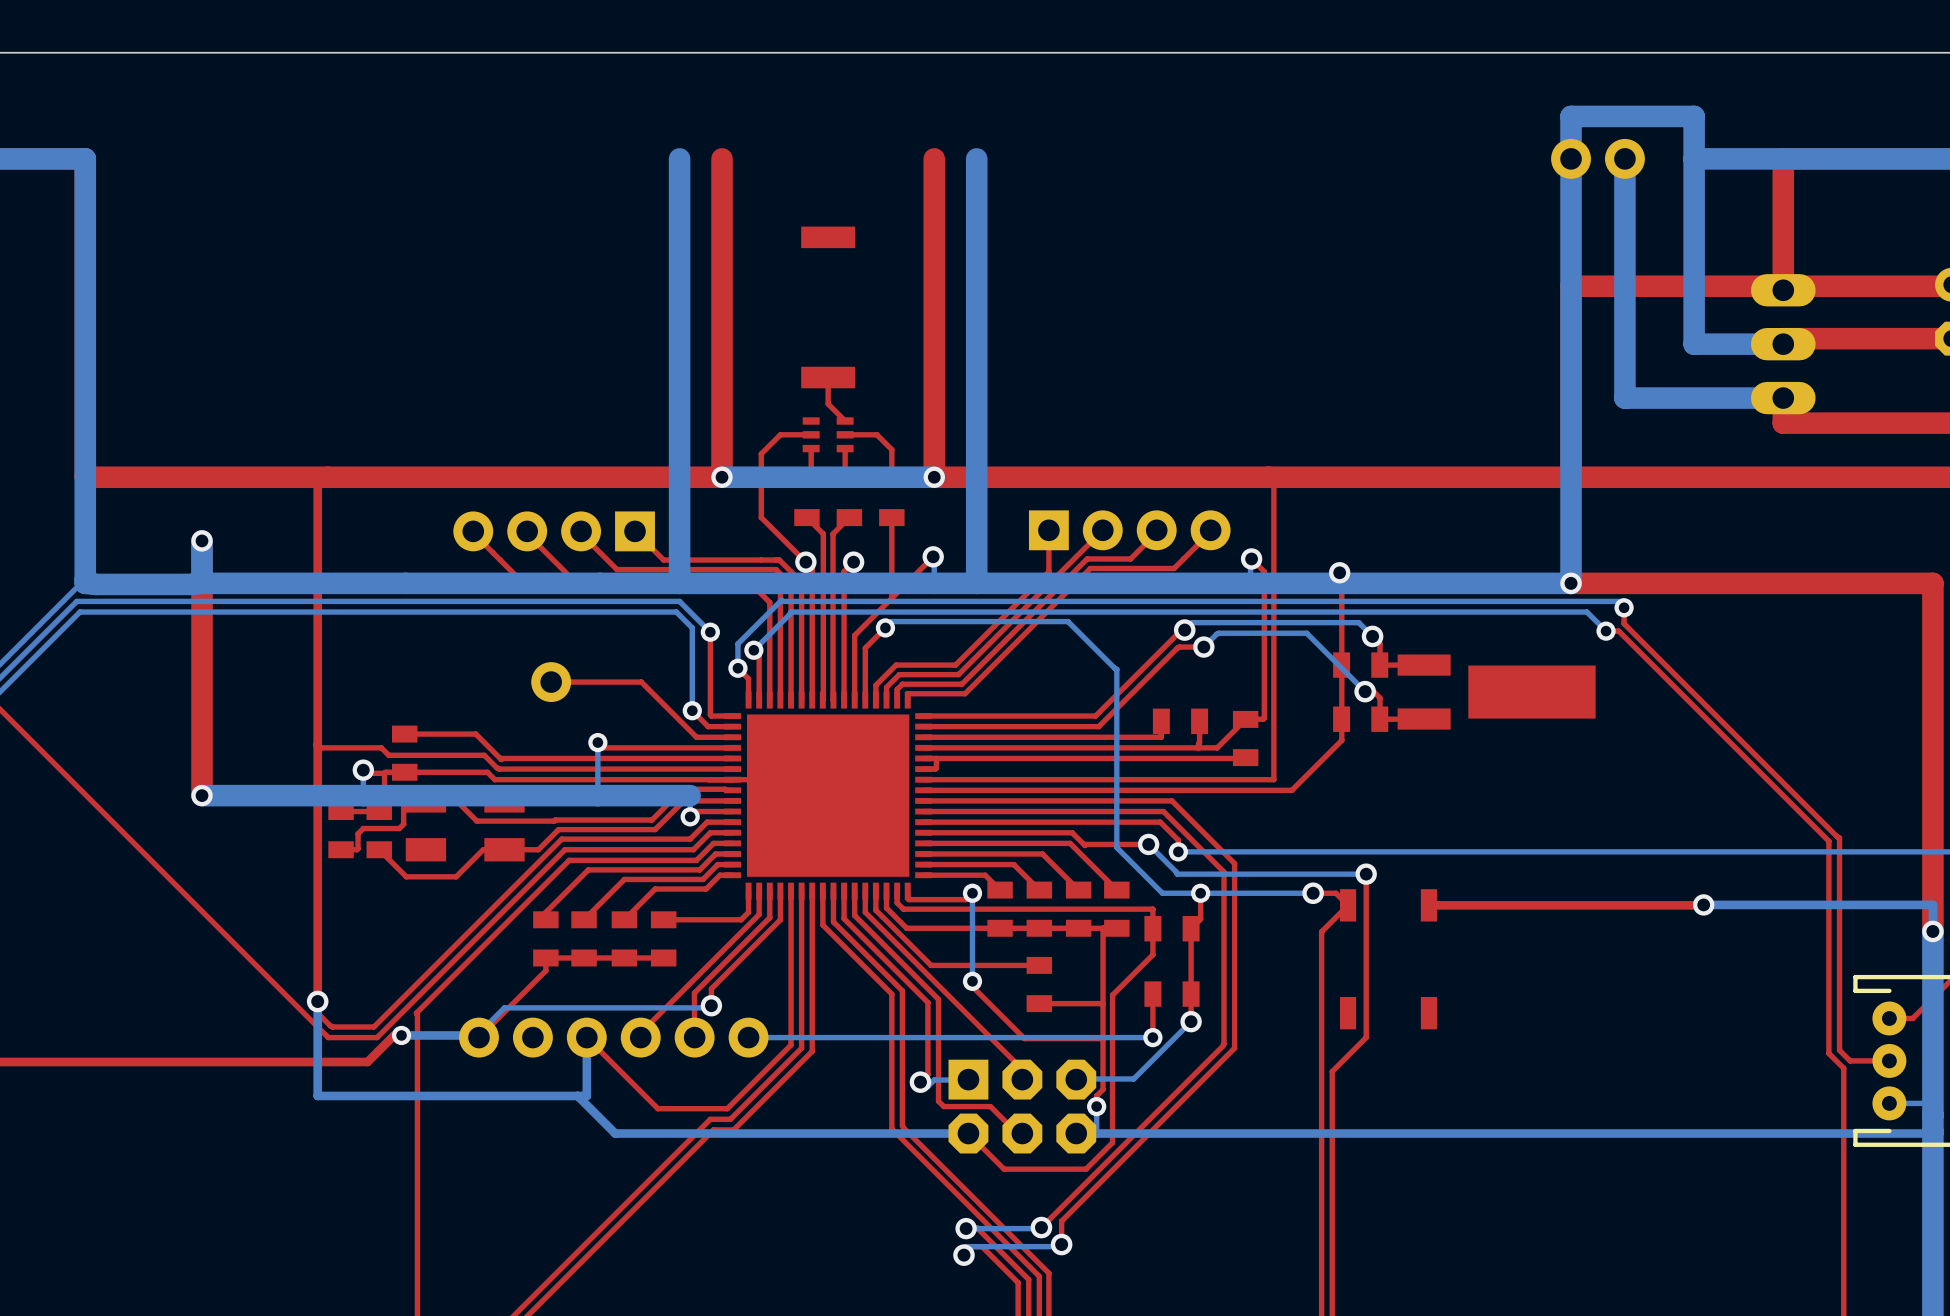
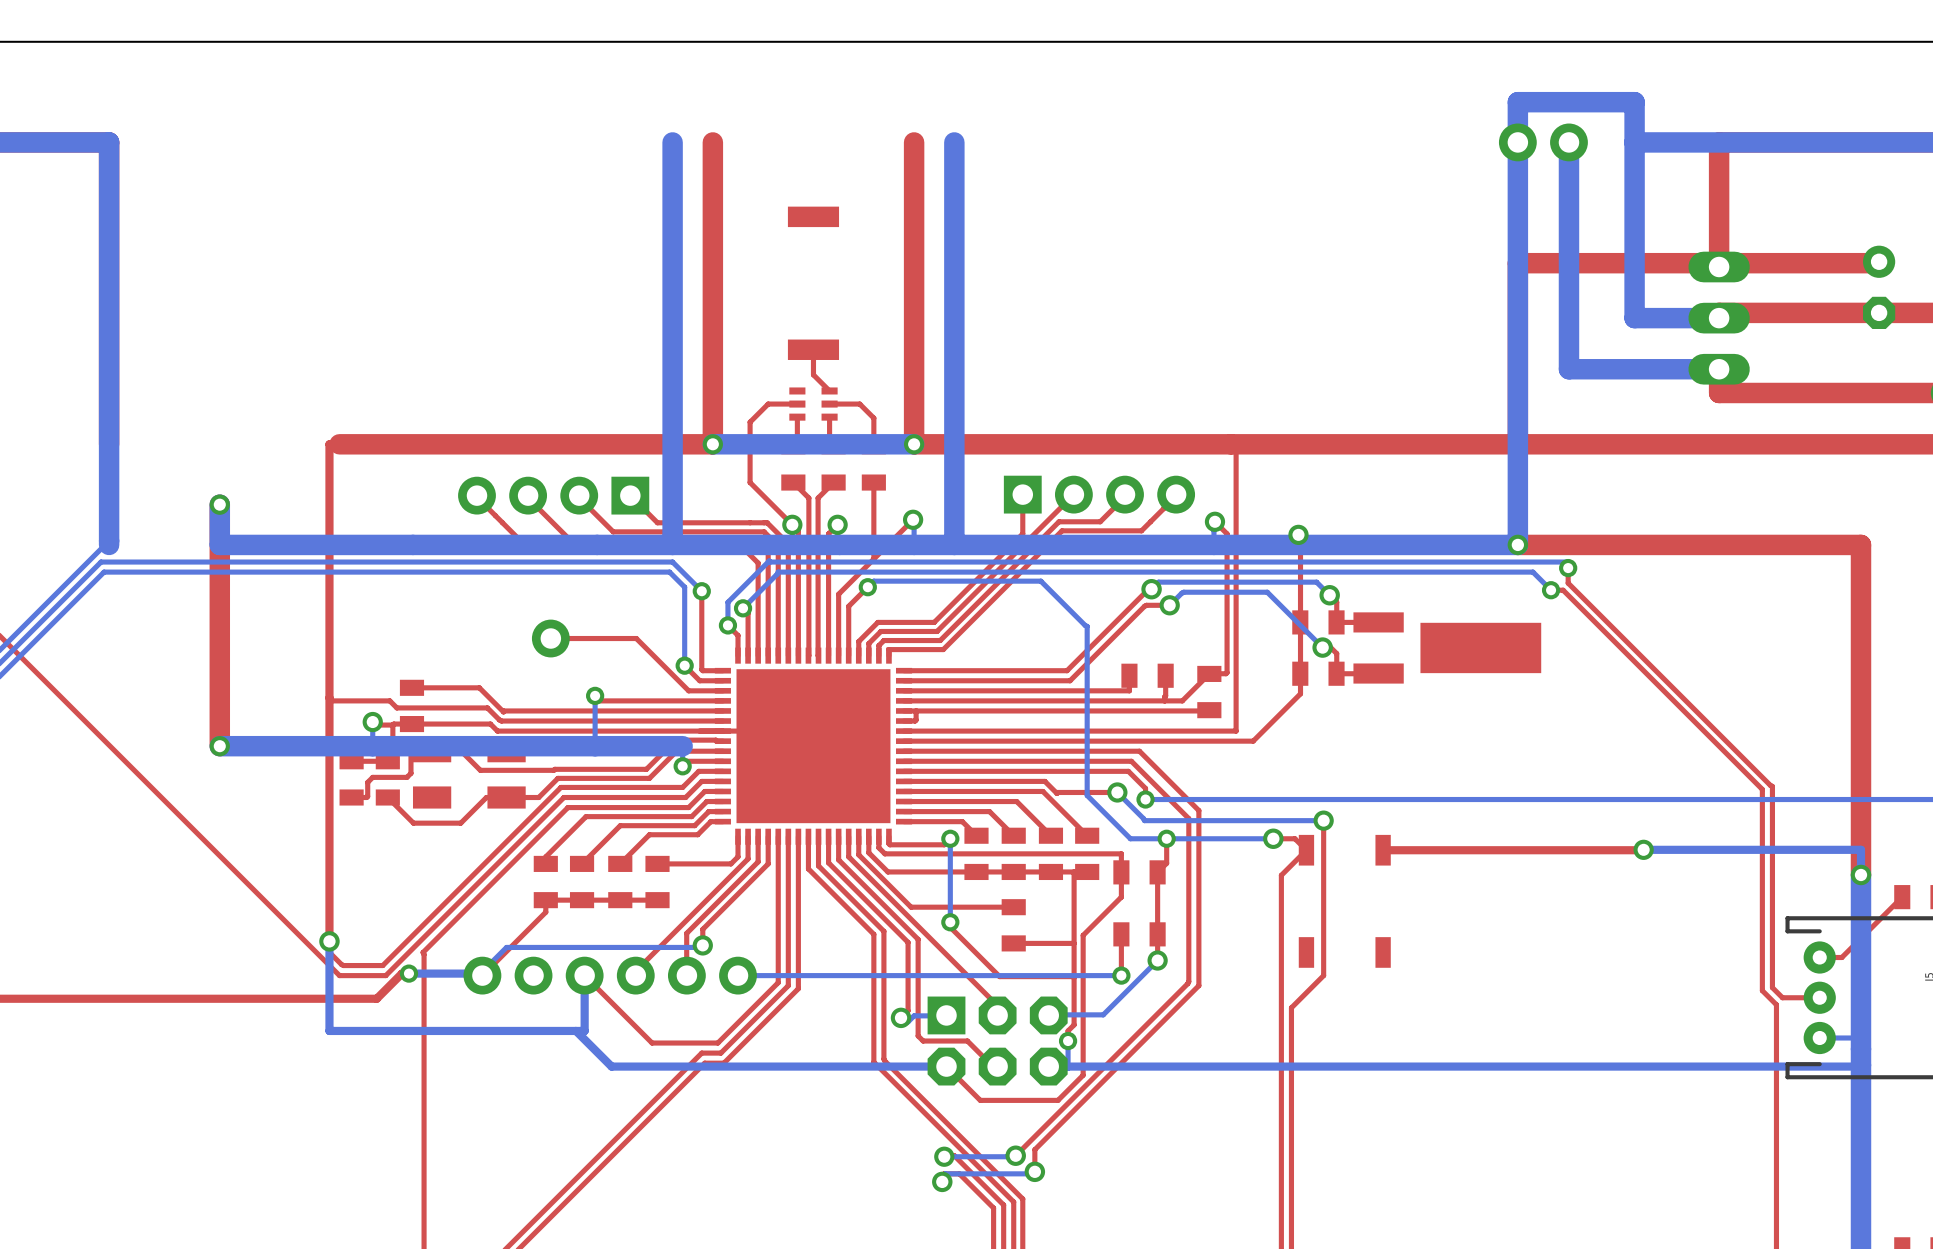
top track: (327, 477) (85, 477) -> none
bottom track: (202, 583) (85, 583) -> none

